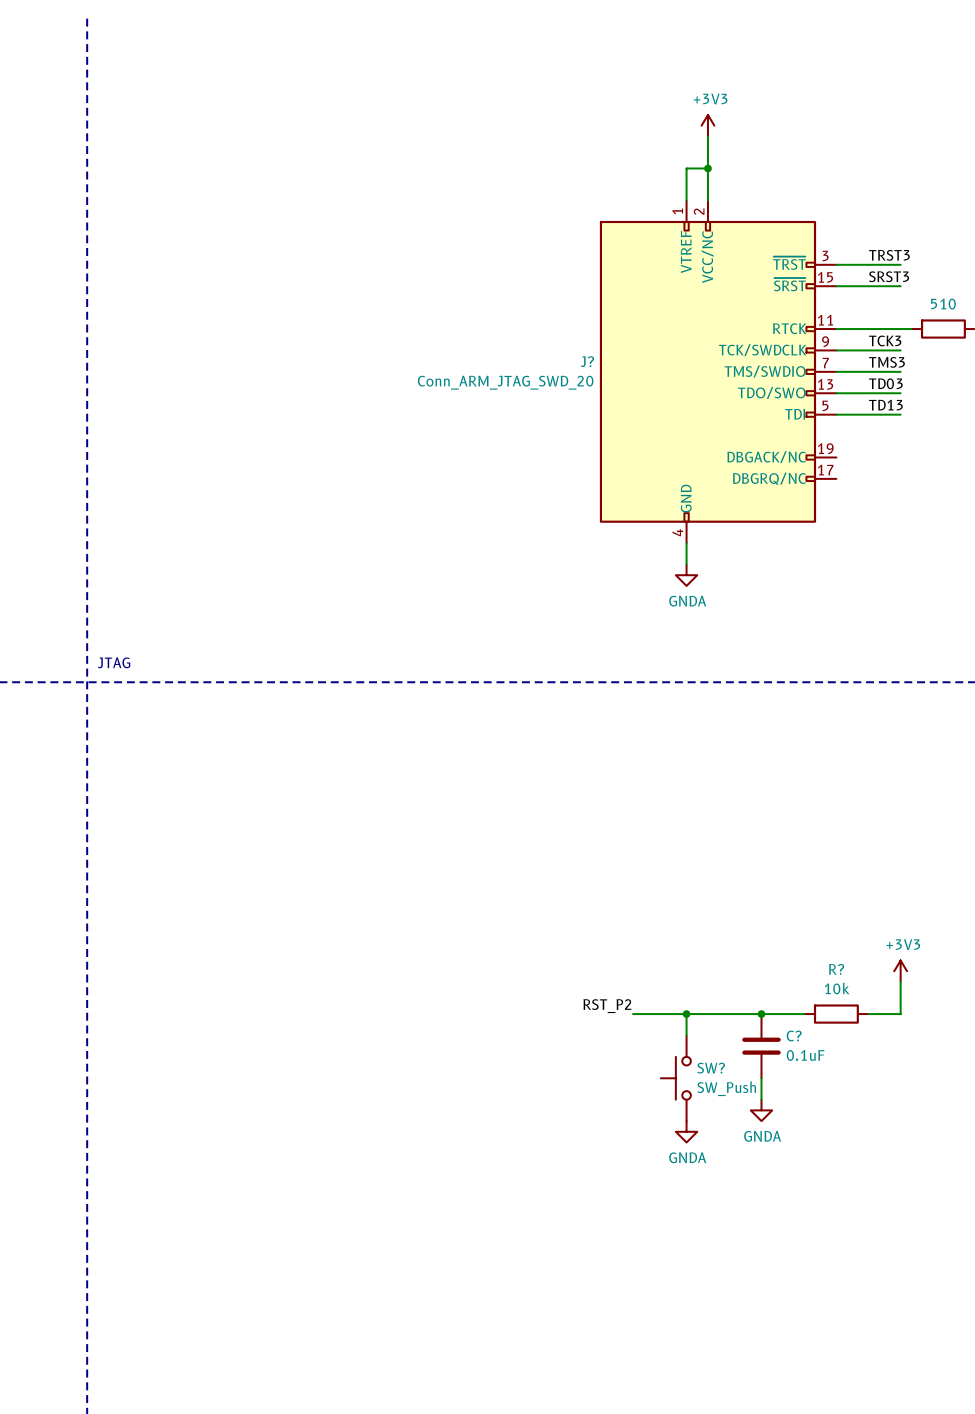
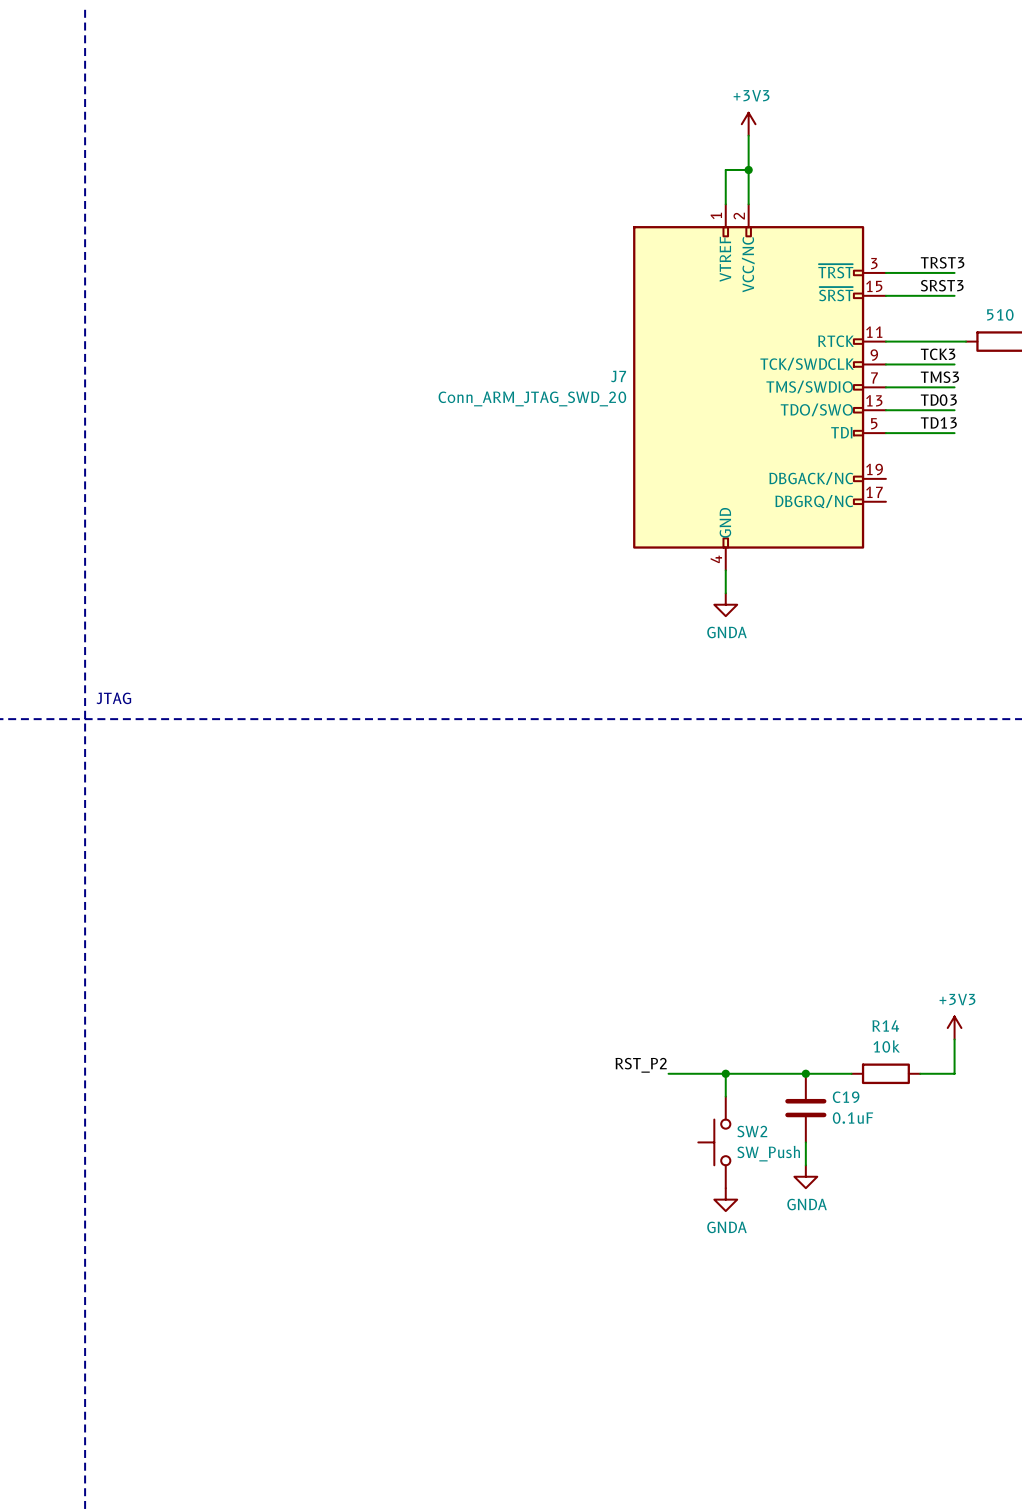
J? name: J? (587, 361) -> J7 (618, 376)
R? name: R? (836, 969) -> R14 (885, 1025)
C? name: C? (794, 1036) -> C19 (846, 1097)
SW? name: SW? (711, 1068) -> SW2 (752, 1131)

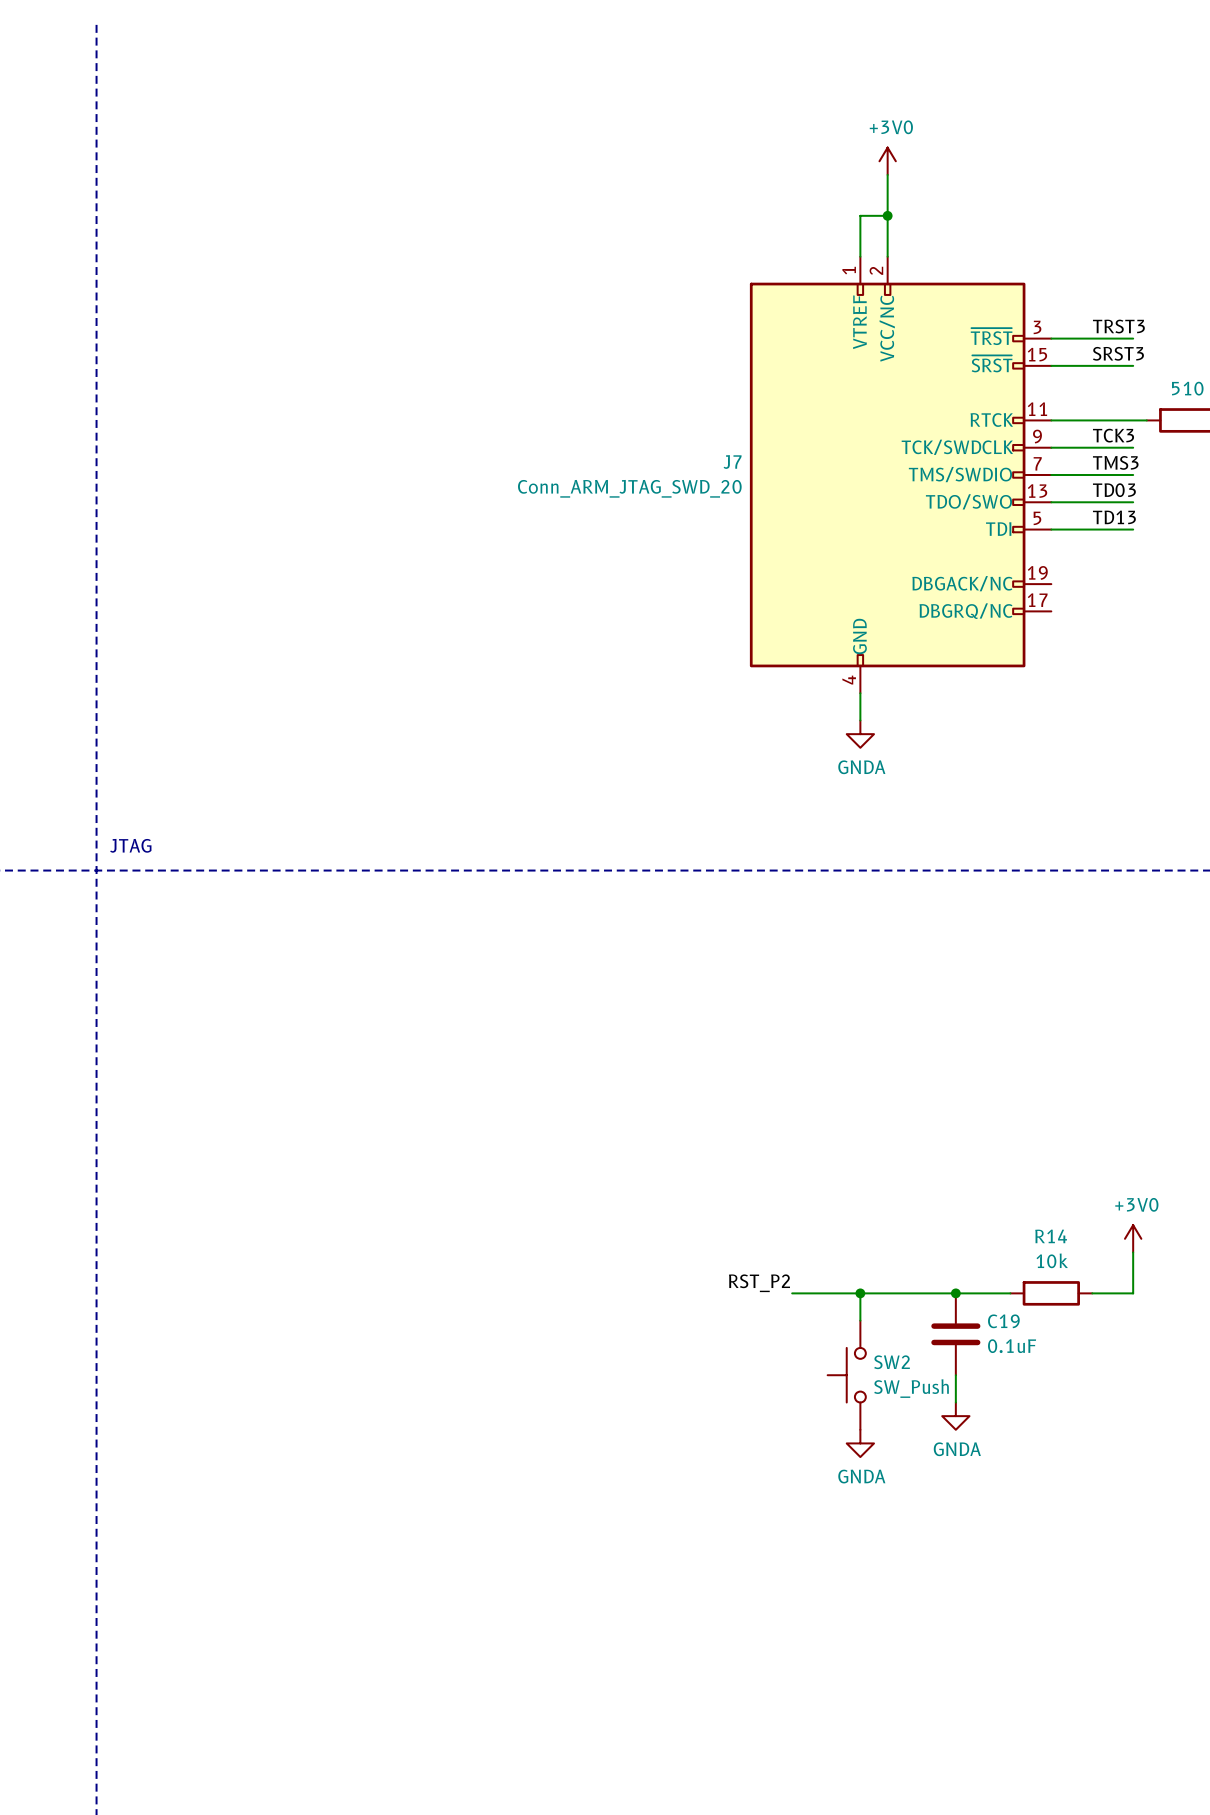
power symbol: +3V3 (748, 124) -> +3V0 (887, 161)
power symbol: +3V3 (954, 1028) -> +3V0 (1133, 1238)

